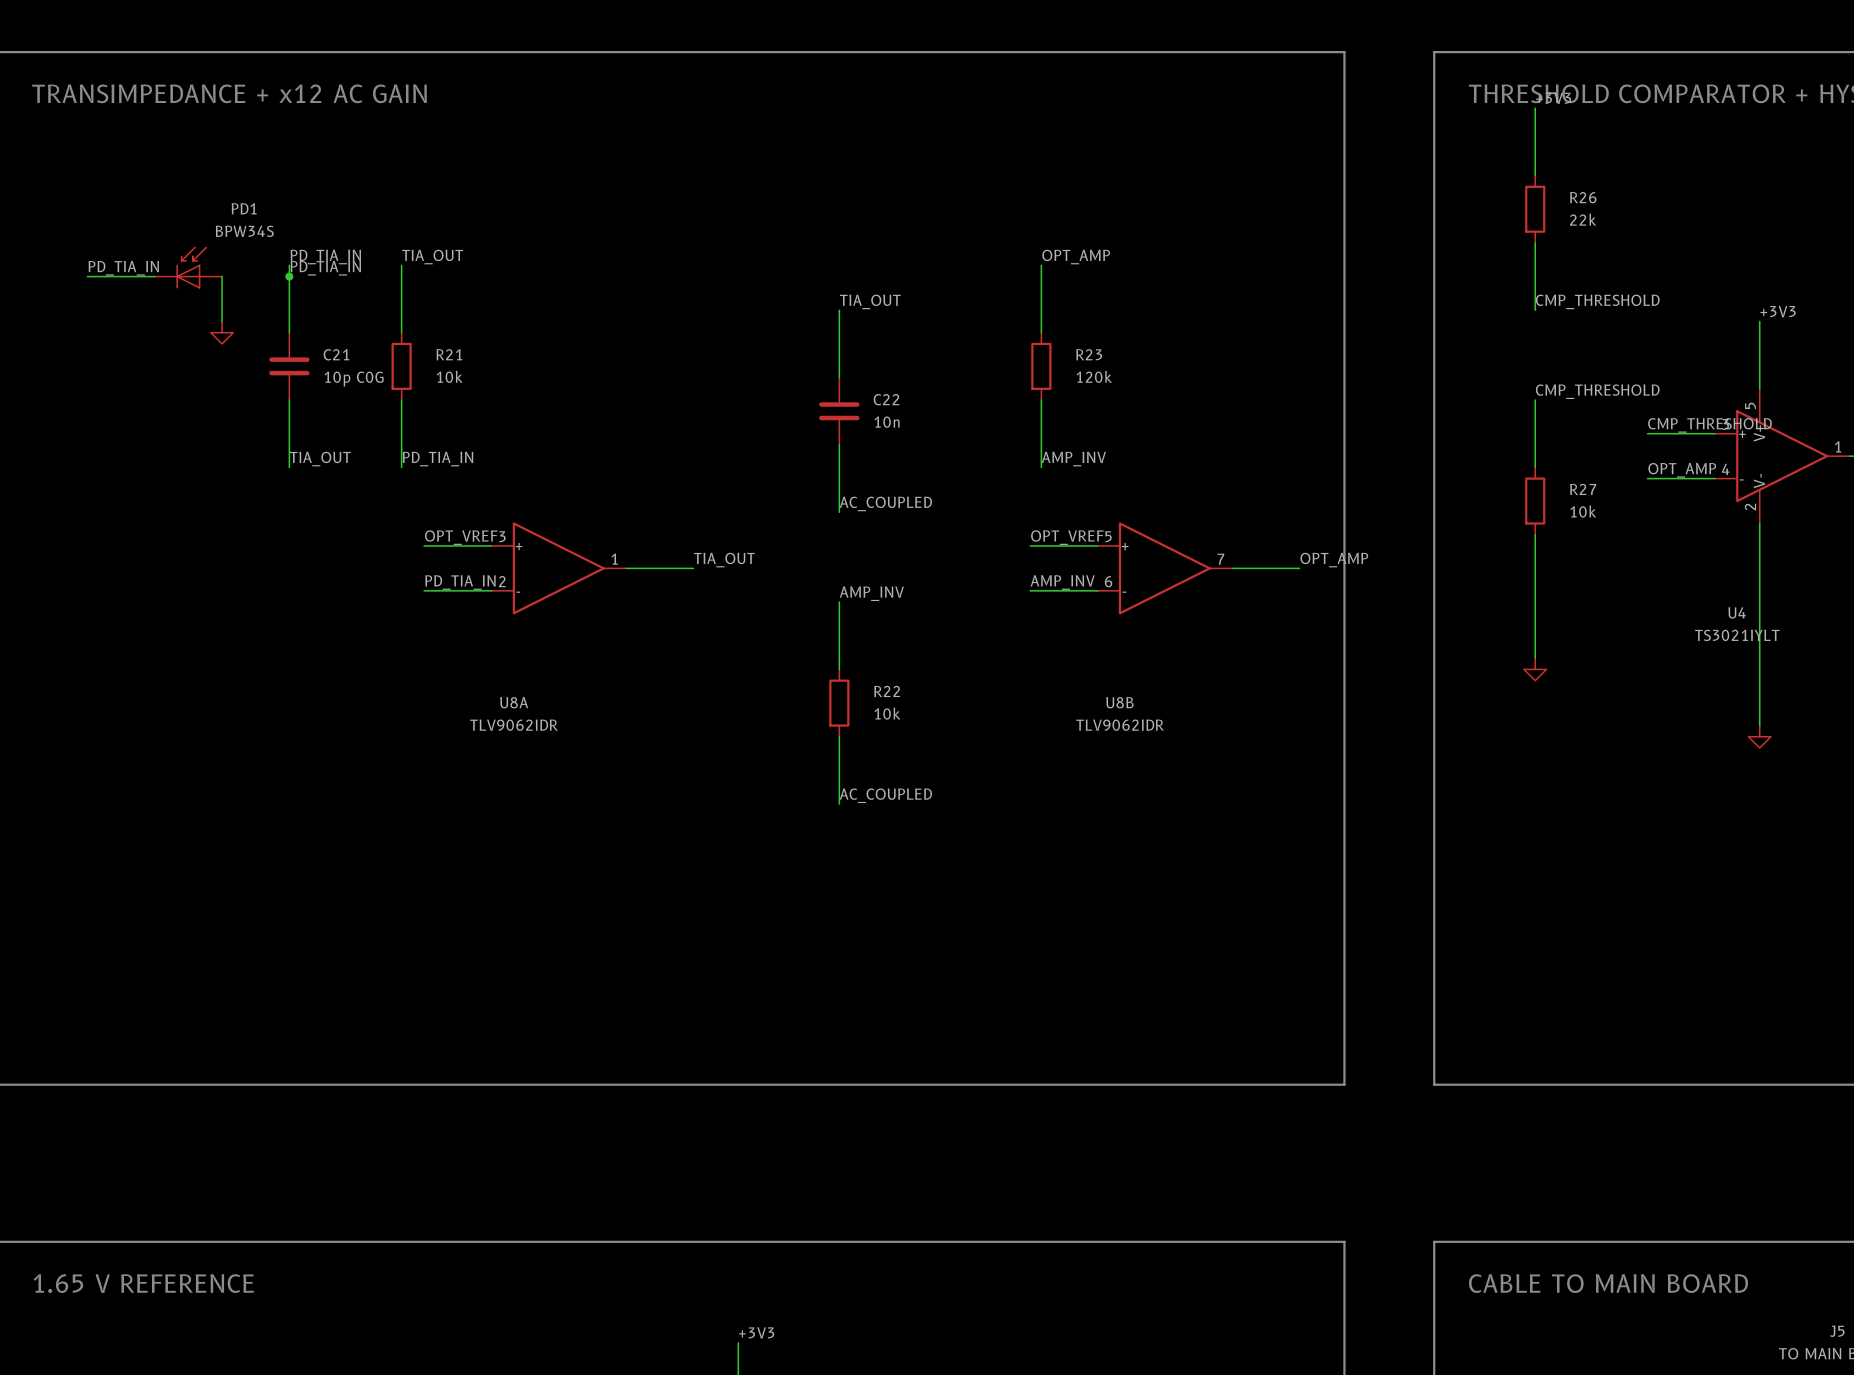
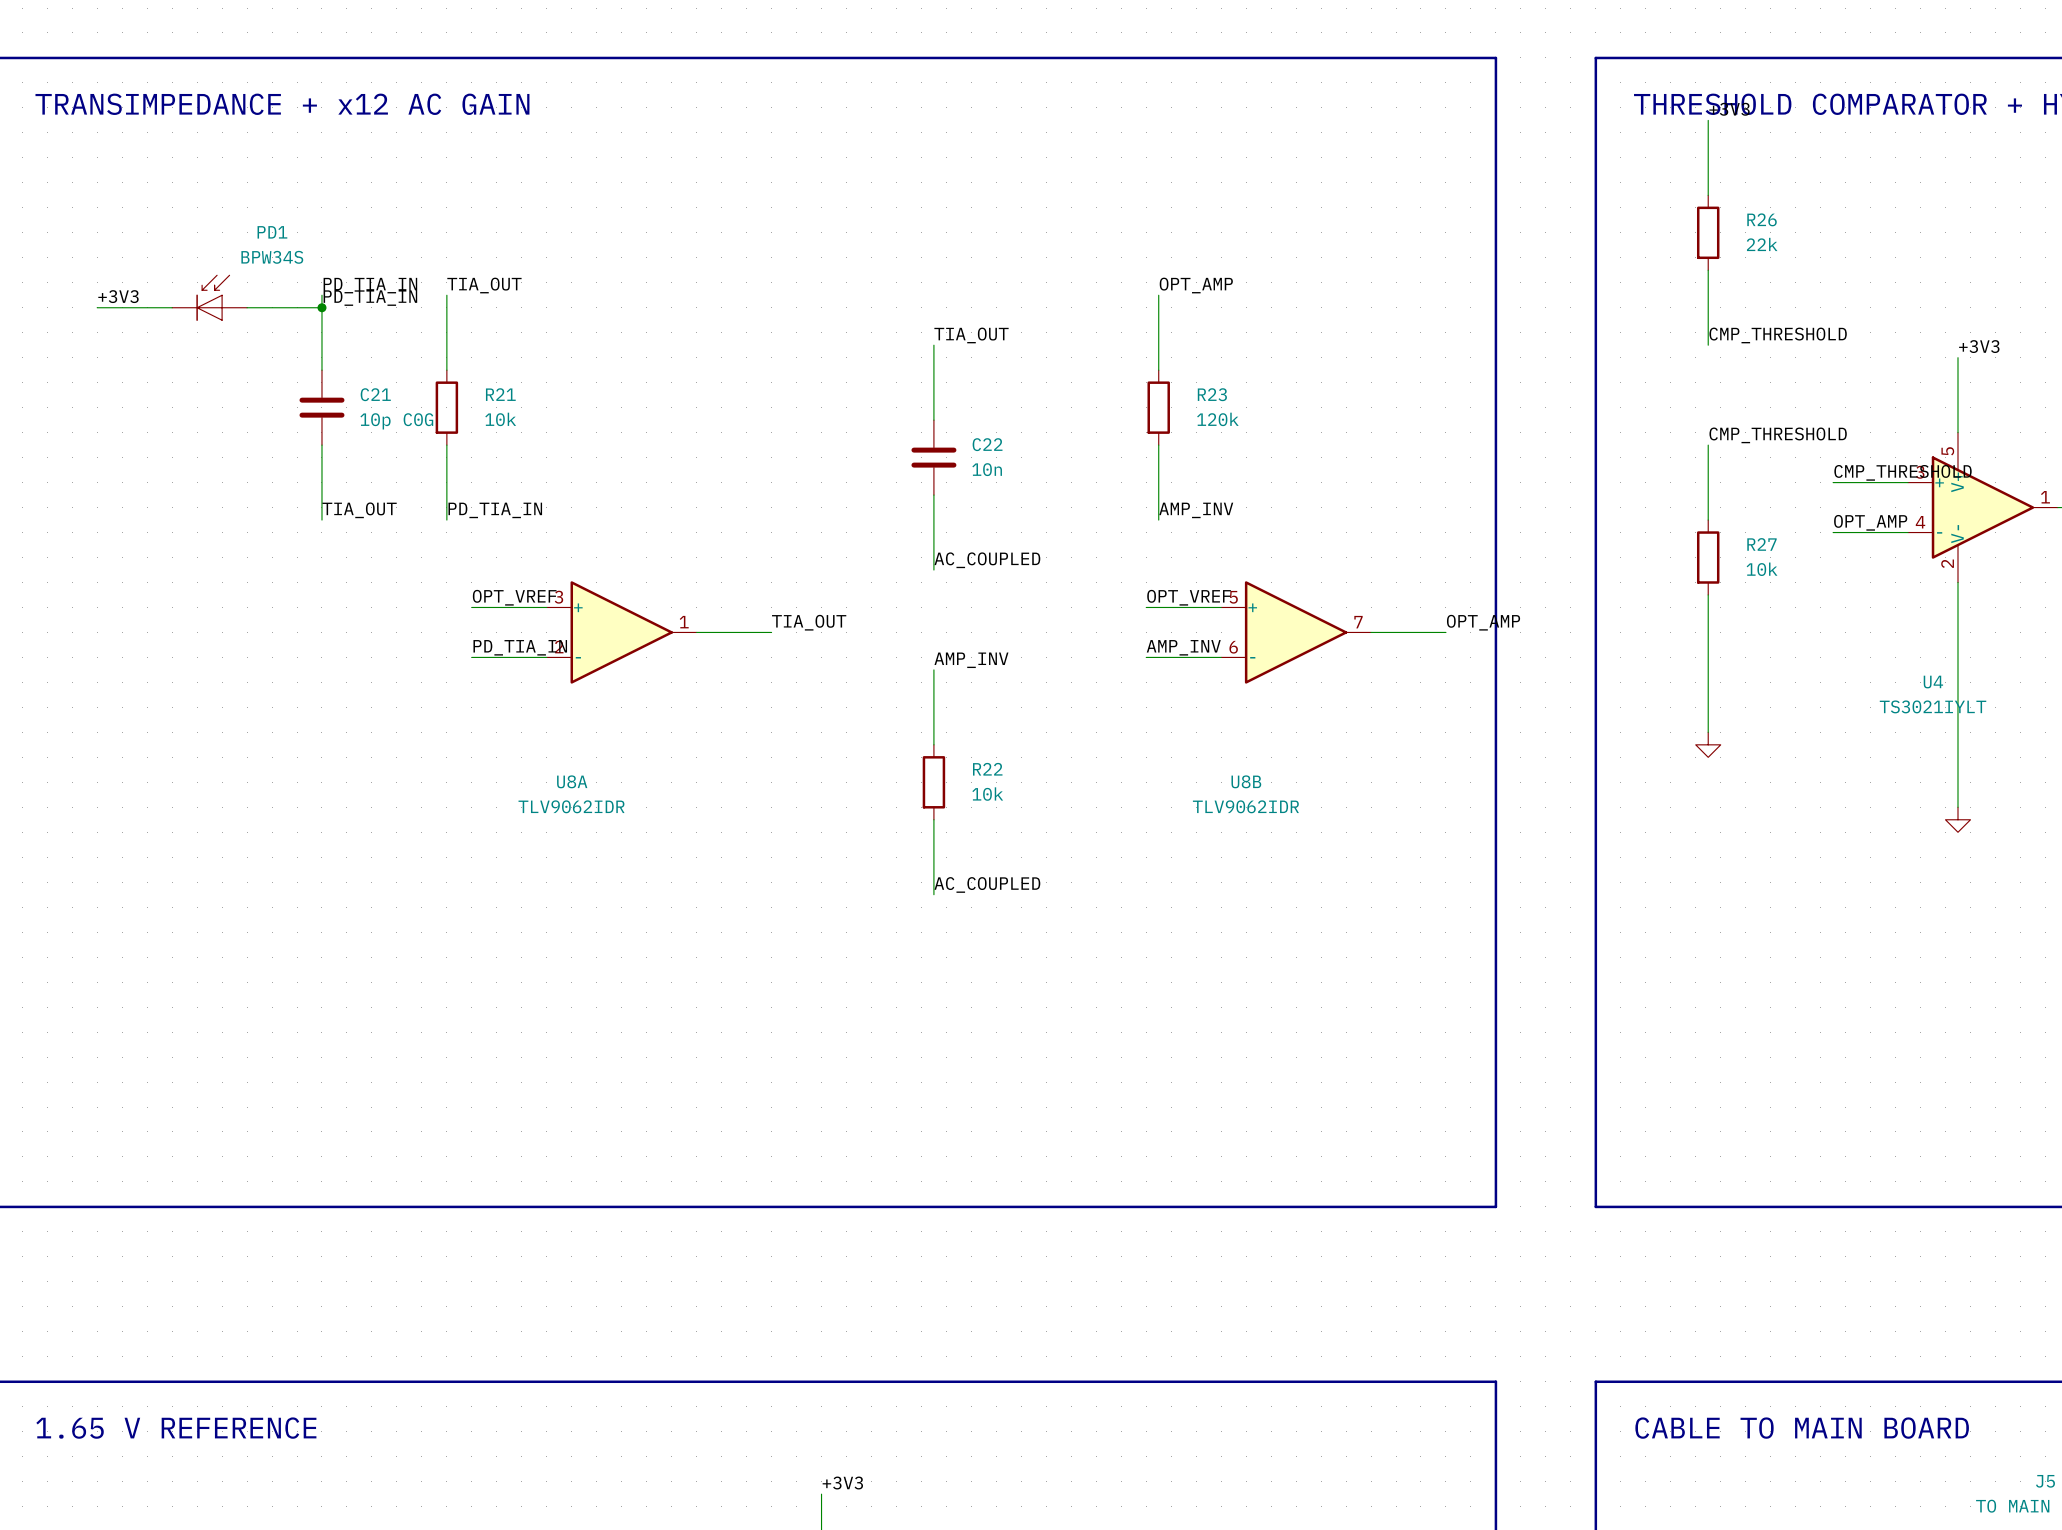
label: PD_TIA_IN (123, 268) -> +3V3 (118, 296)
wire: (222, 276) (222, 321) -> (247, 307) (321, 307)
power symbol: (222, 332) -> none

